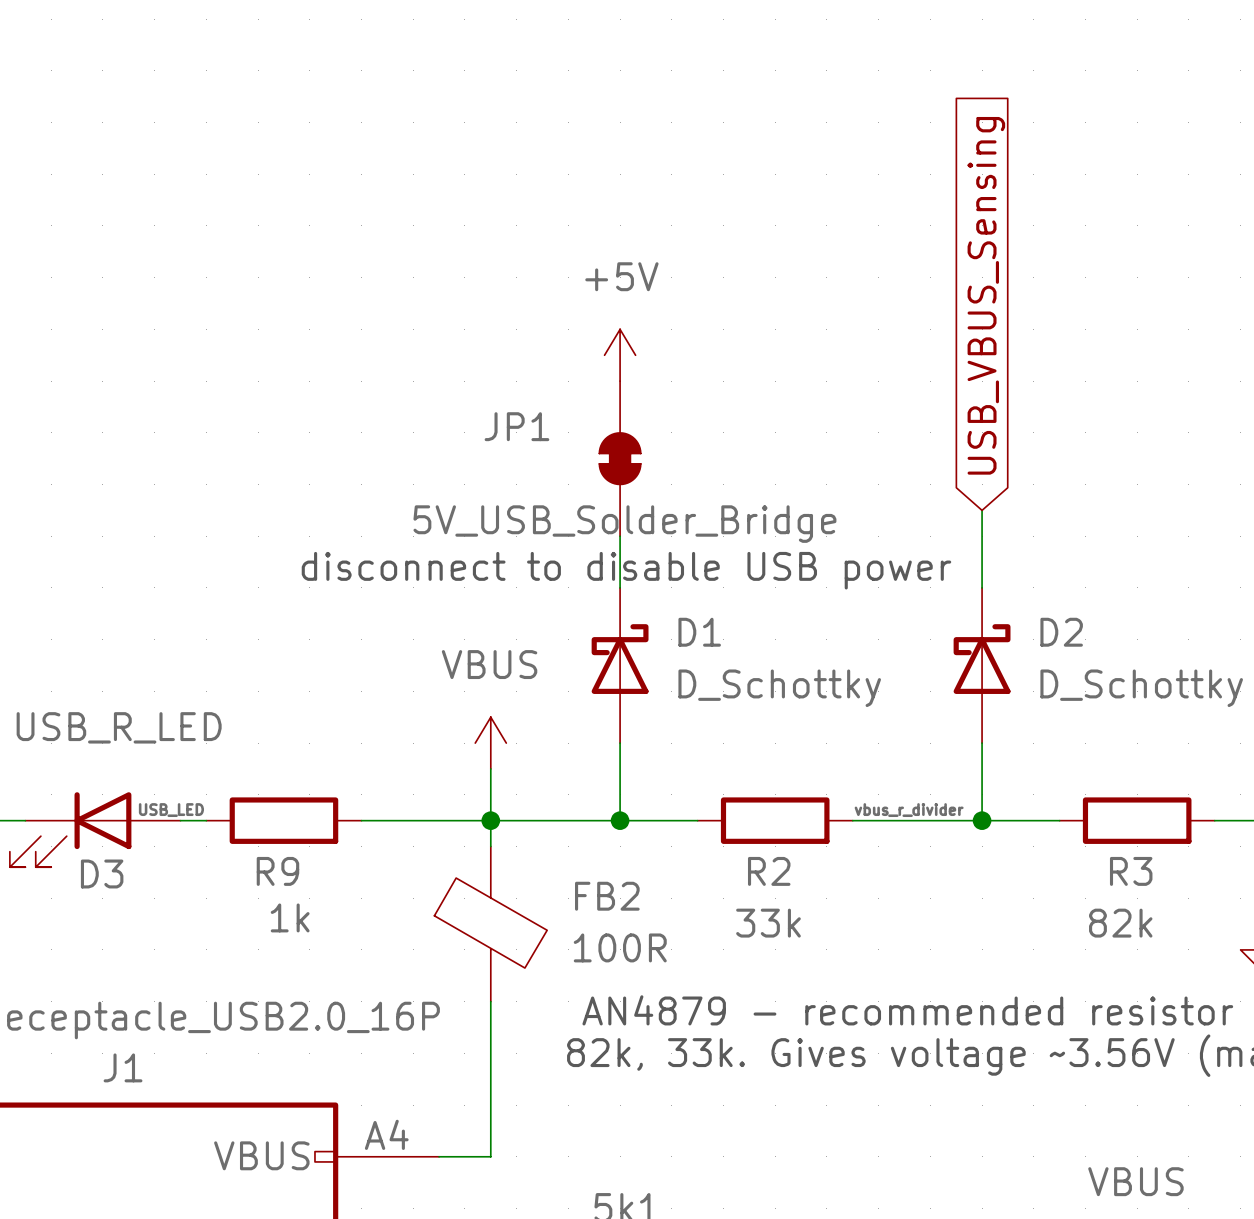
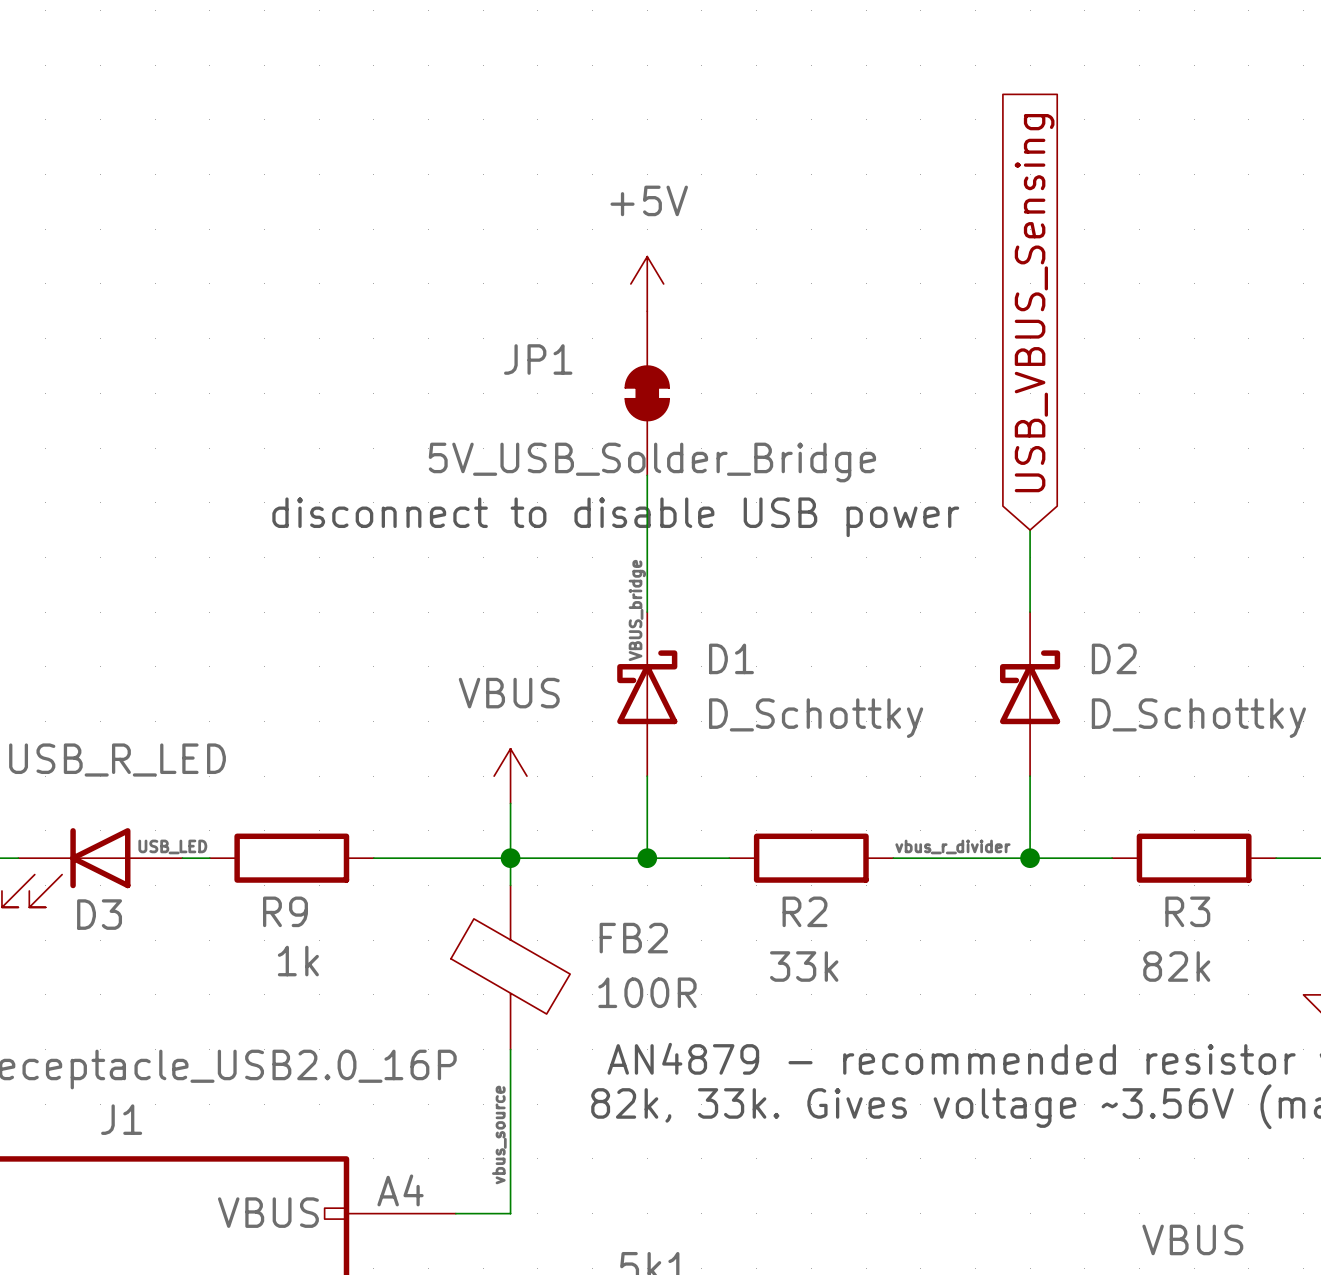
power symbol position: +5V (620, 355) -> +5V (647, 283)
JP1 position: (620, 458) -> (647, 393)
text position: disconnect to disable USB power (626, 570) -> disconnect to disable USB power (615, 517)
label: none -> VBUS_bridge (637, 610)
label: none -> vbus_source (499, 1135)

